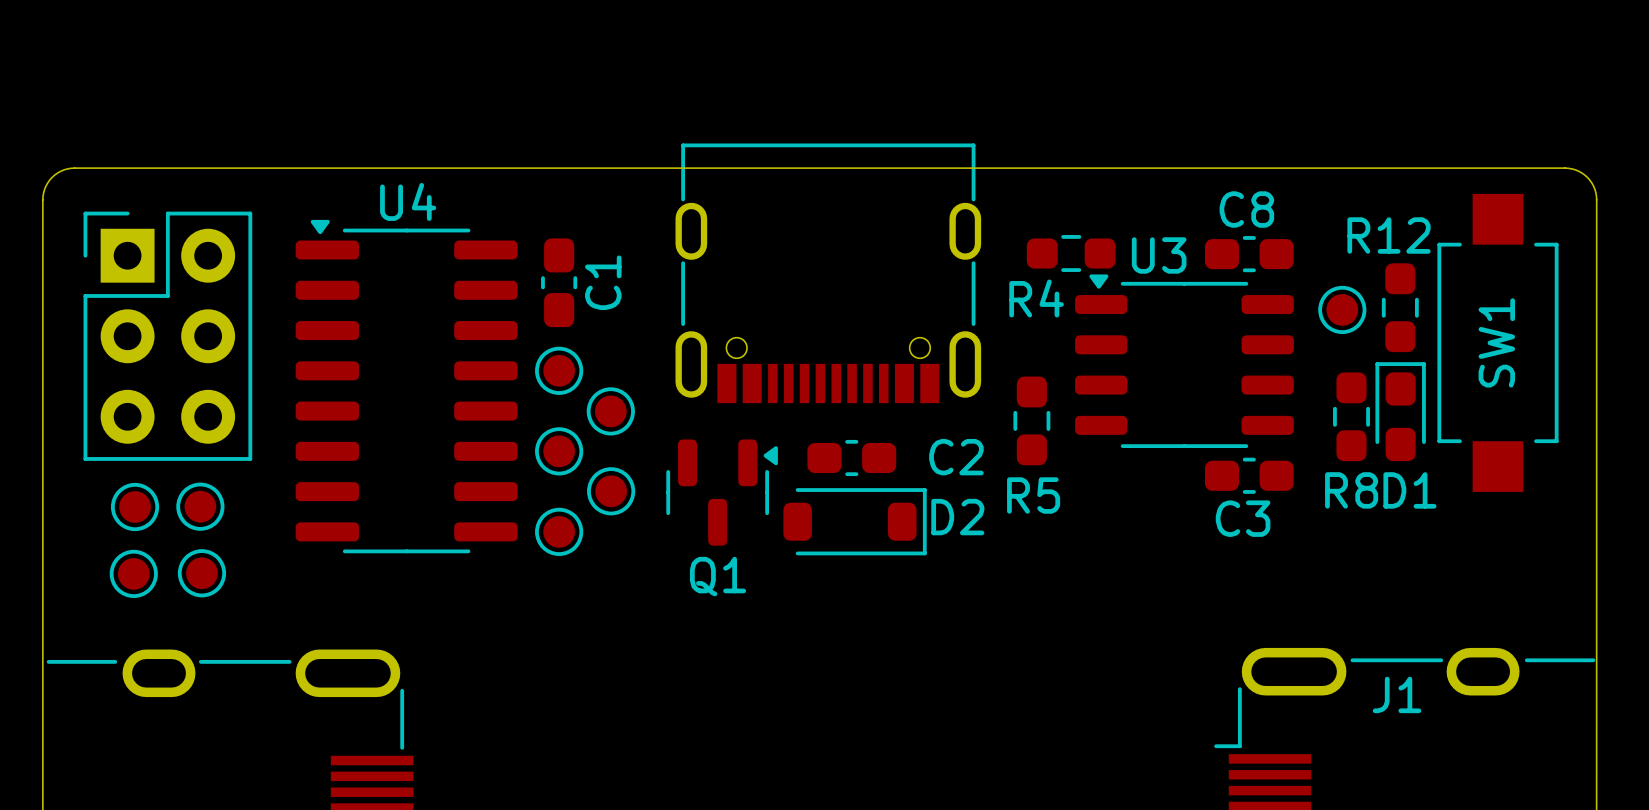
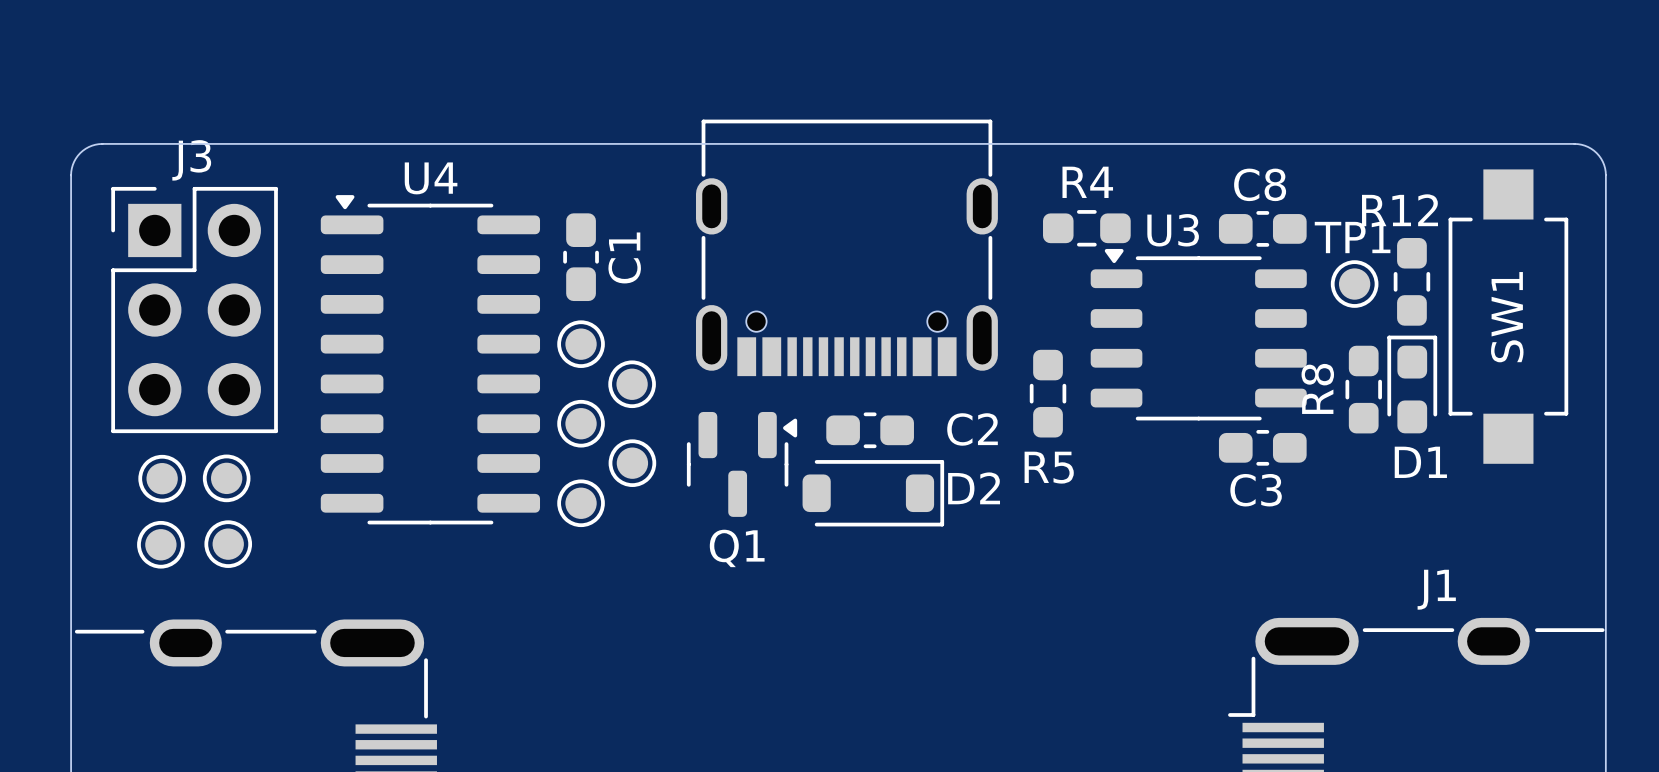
TP1 name: none -> TP1 (1352, 237)
R4 name position: R4 (1036, 298) -> R4 (1087, 182)
part: (167, 336) -> none
J3: none -> (194, 310)
R8 name rotation: 0° (1351, 490) -> 90° counterclockwise (1317, 388)
R8 name position: R8 (1351, 490) -> R8 (1317, 388)
J1 name position: J1 (1397, 694) -> J1 (1436, 589)

